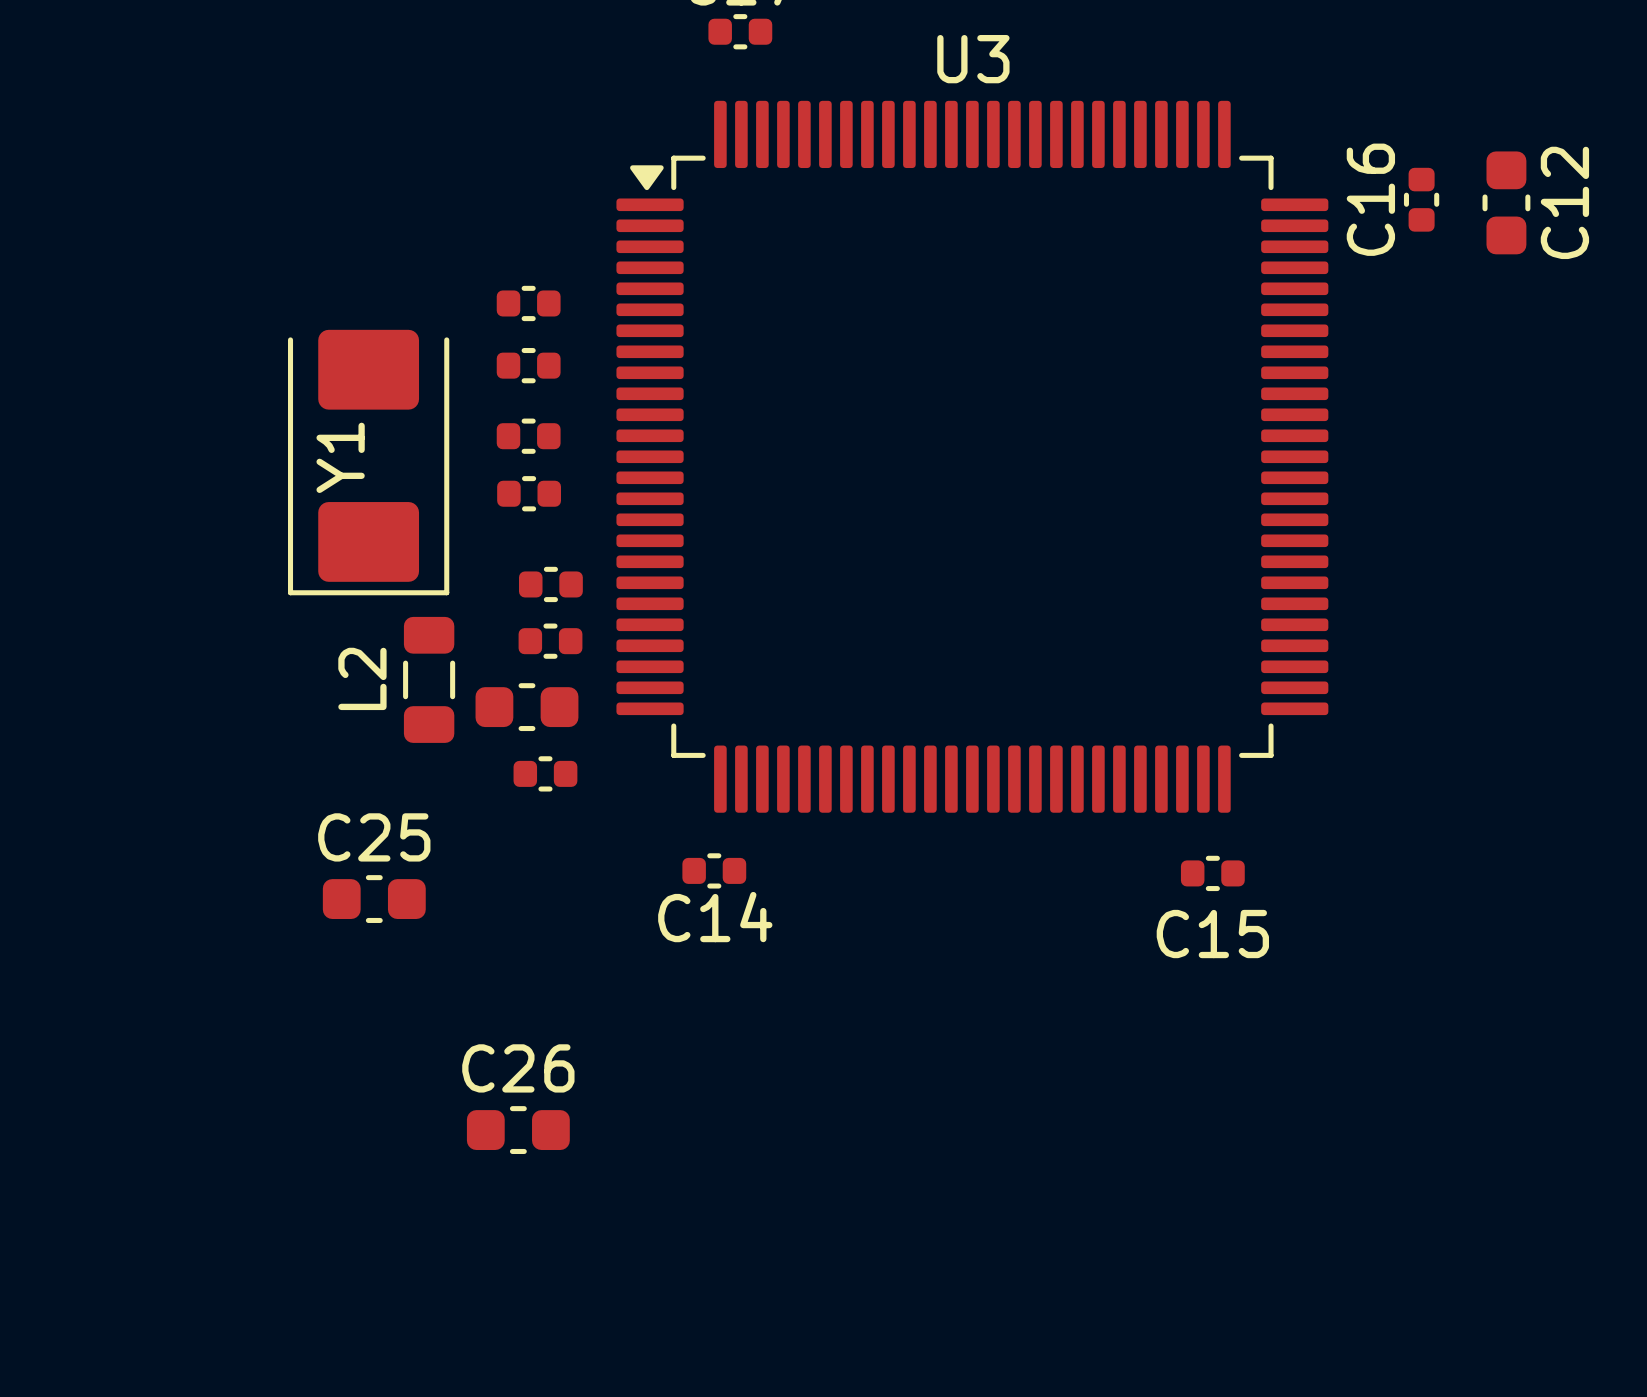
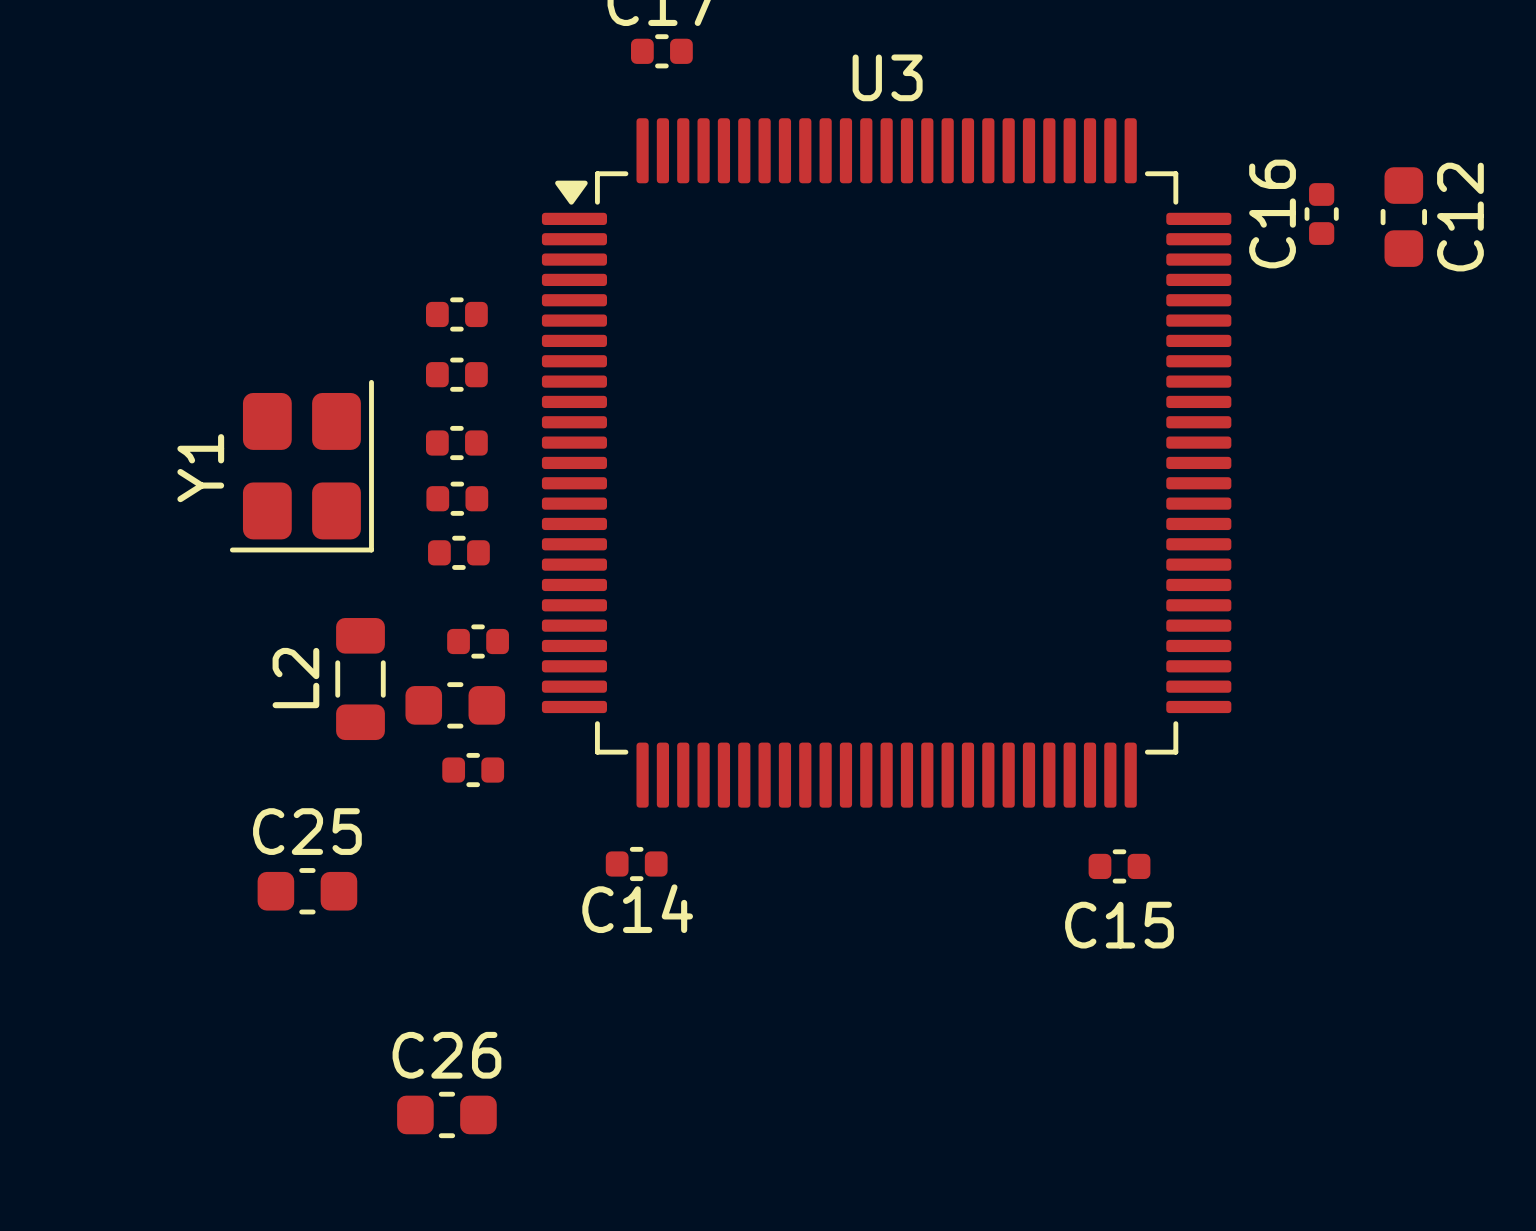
Y1 footprint: [287, 329, 450, 596] -> [229, 379, 374, 553]
part position: (550, 584) -> (458, 552)

